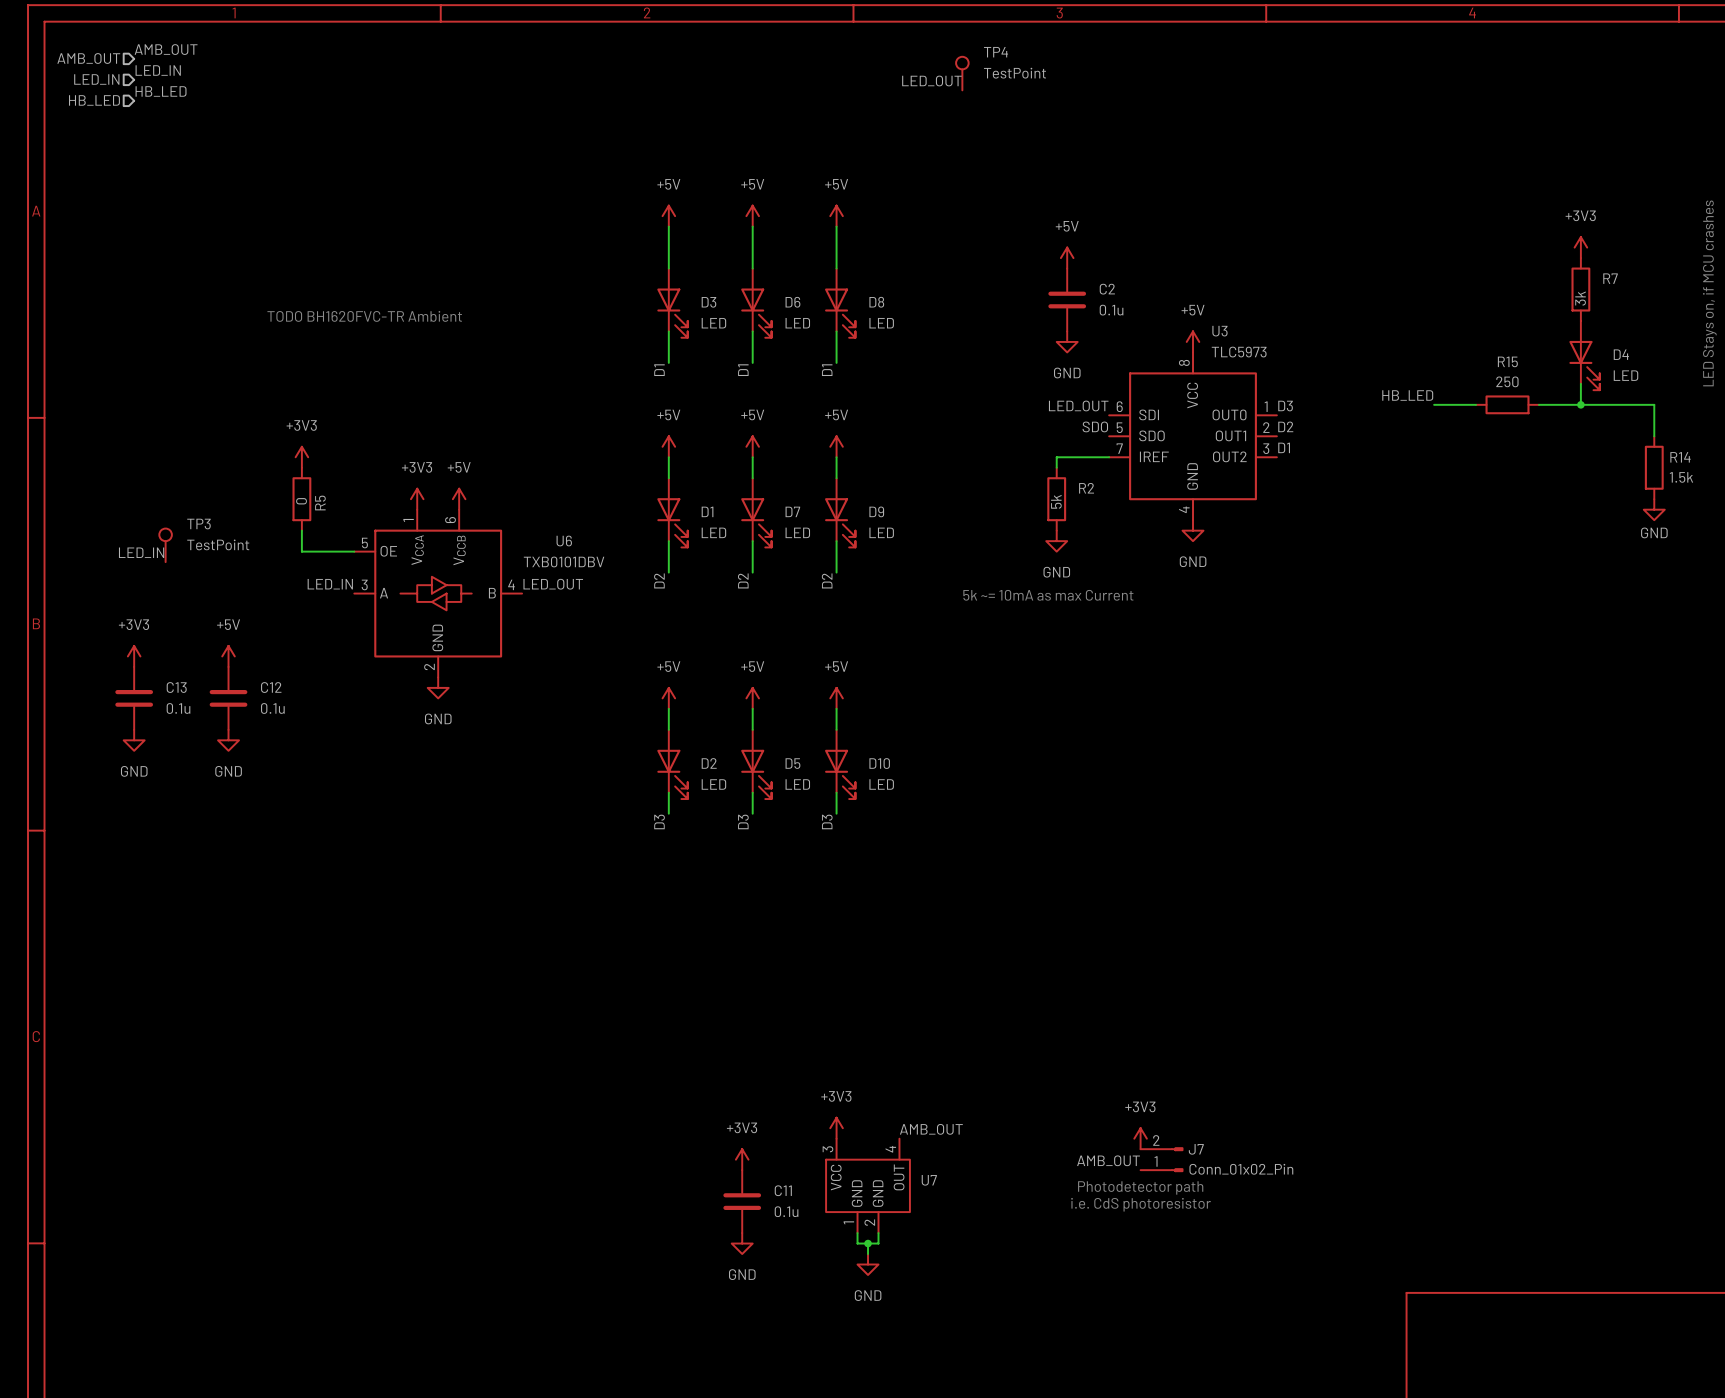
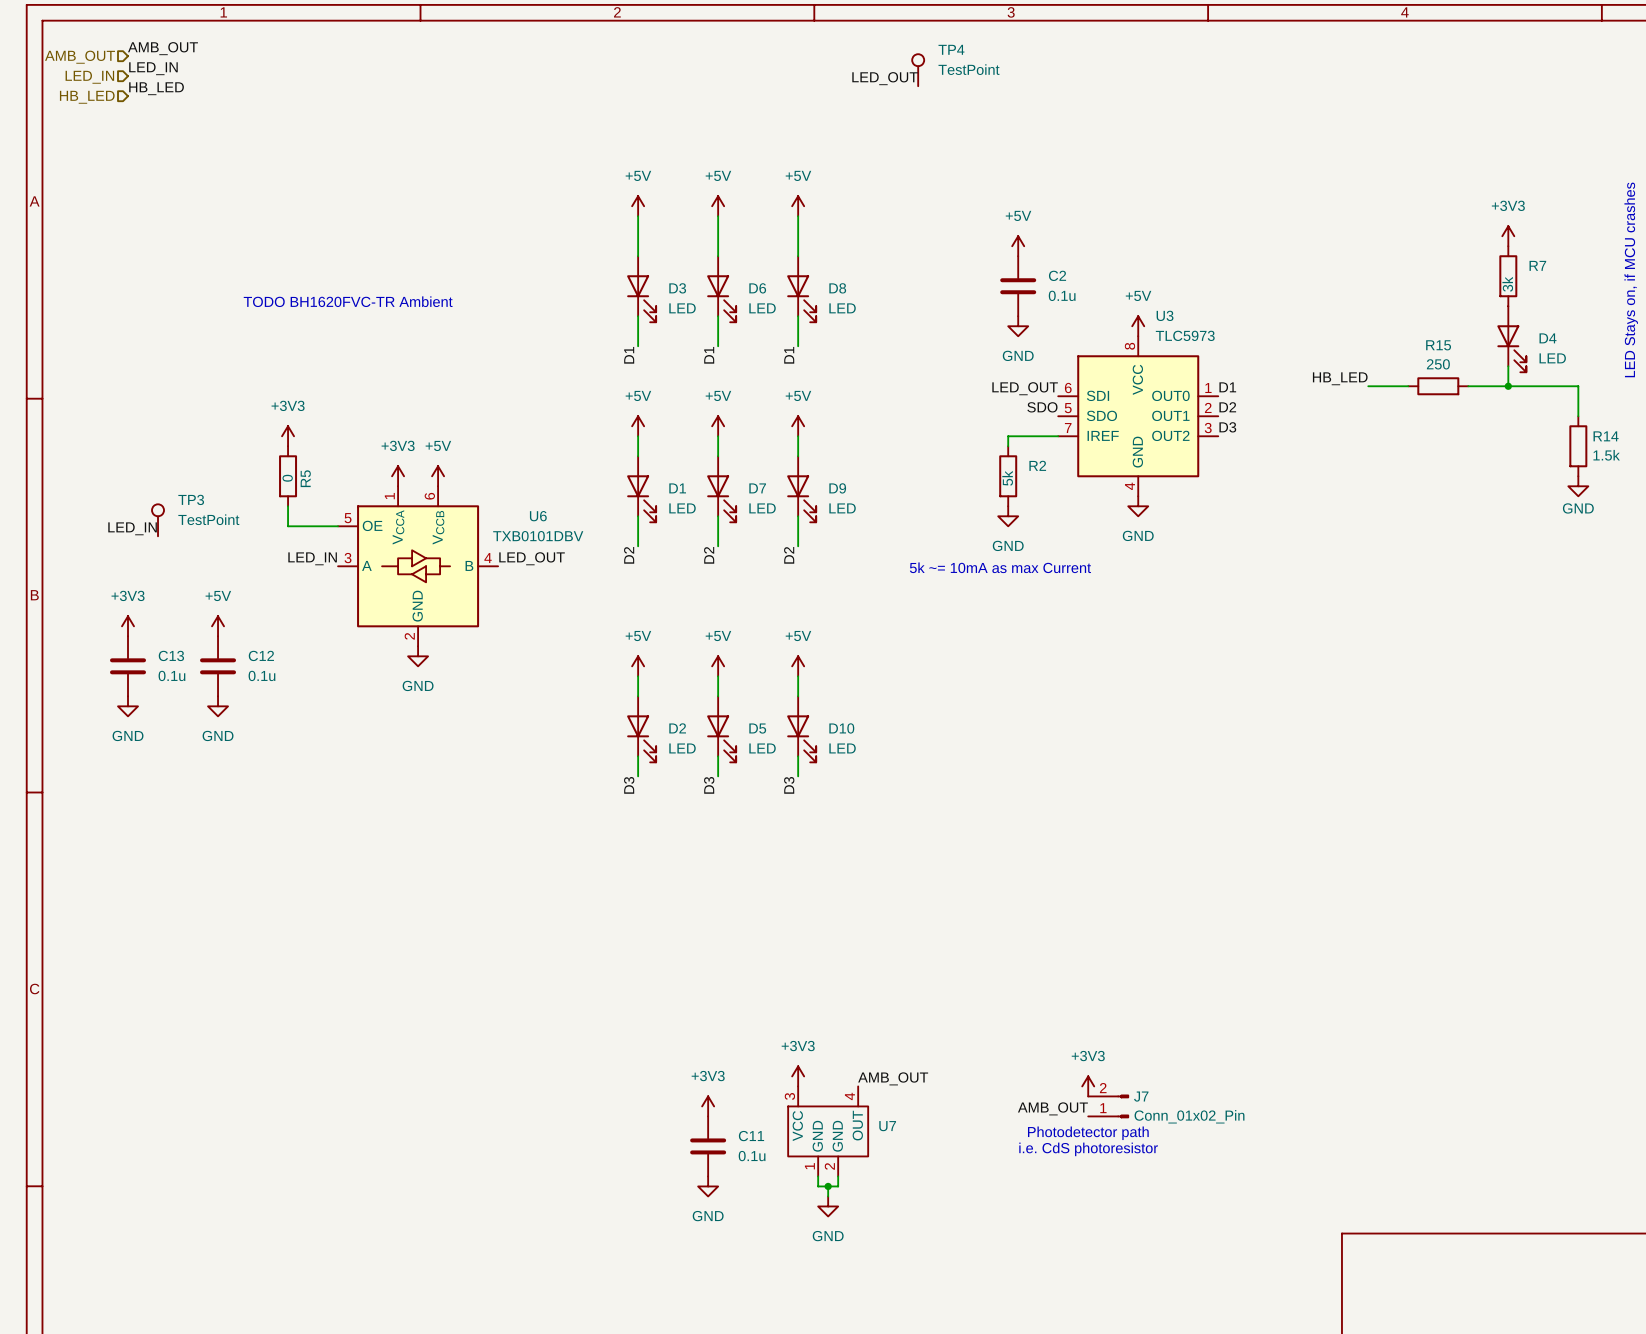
label: D3 (1285, 406) -> D1 (1227, 387)
label: D1 (1284, 447) -> D3 (1227, 427)

